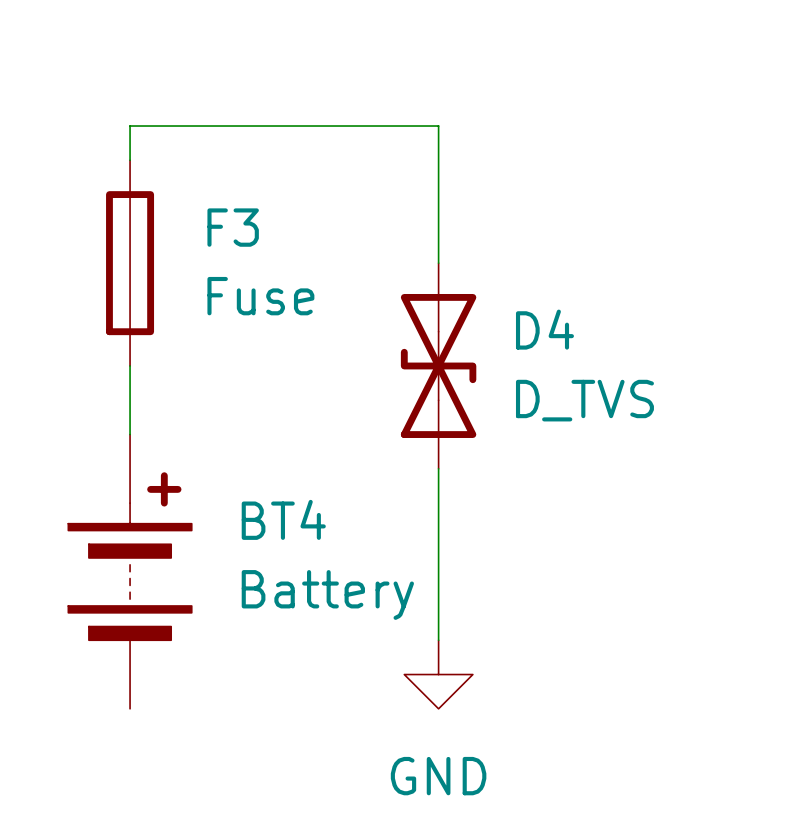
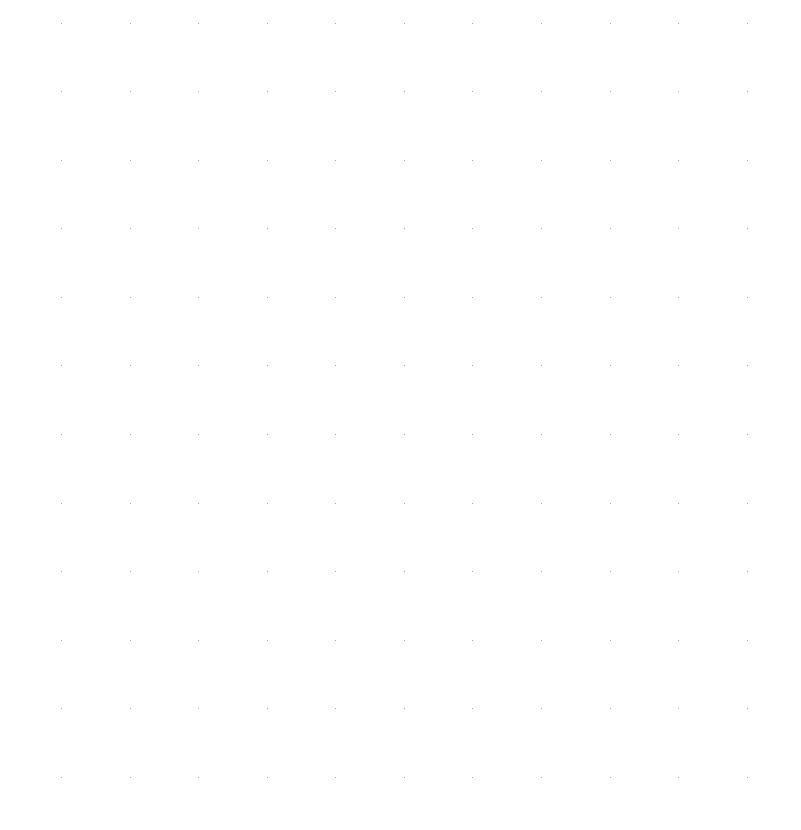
wire: (130, 160) (130, 126) (438, 126) (438, 263) -> none
F3: Fuse (130, 263) -> none
wire: (130, 365) (130, 434) -> none
D4: D_TVS (438, 365) -> none
wire: (438, 468) (438, 640) -> none
BT4: Battery (130, 571) -> none
power symbol: GND (438, 674) -> none

